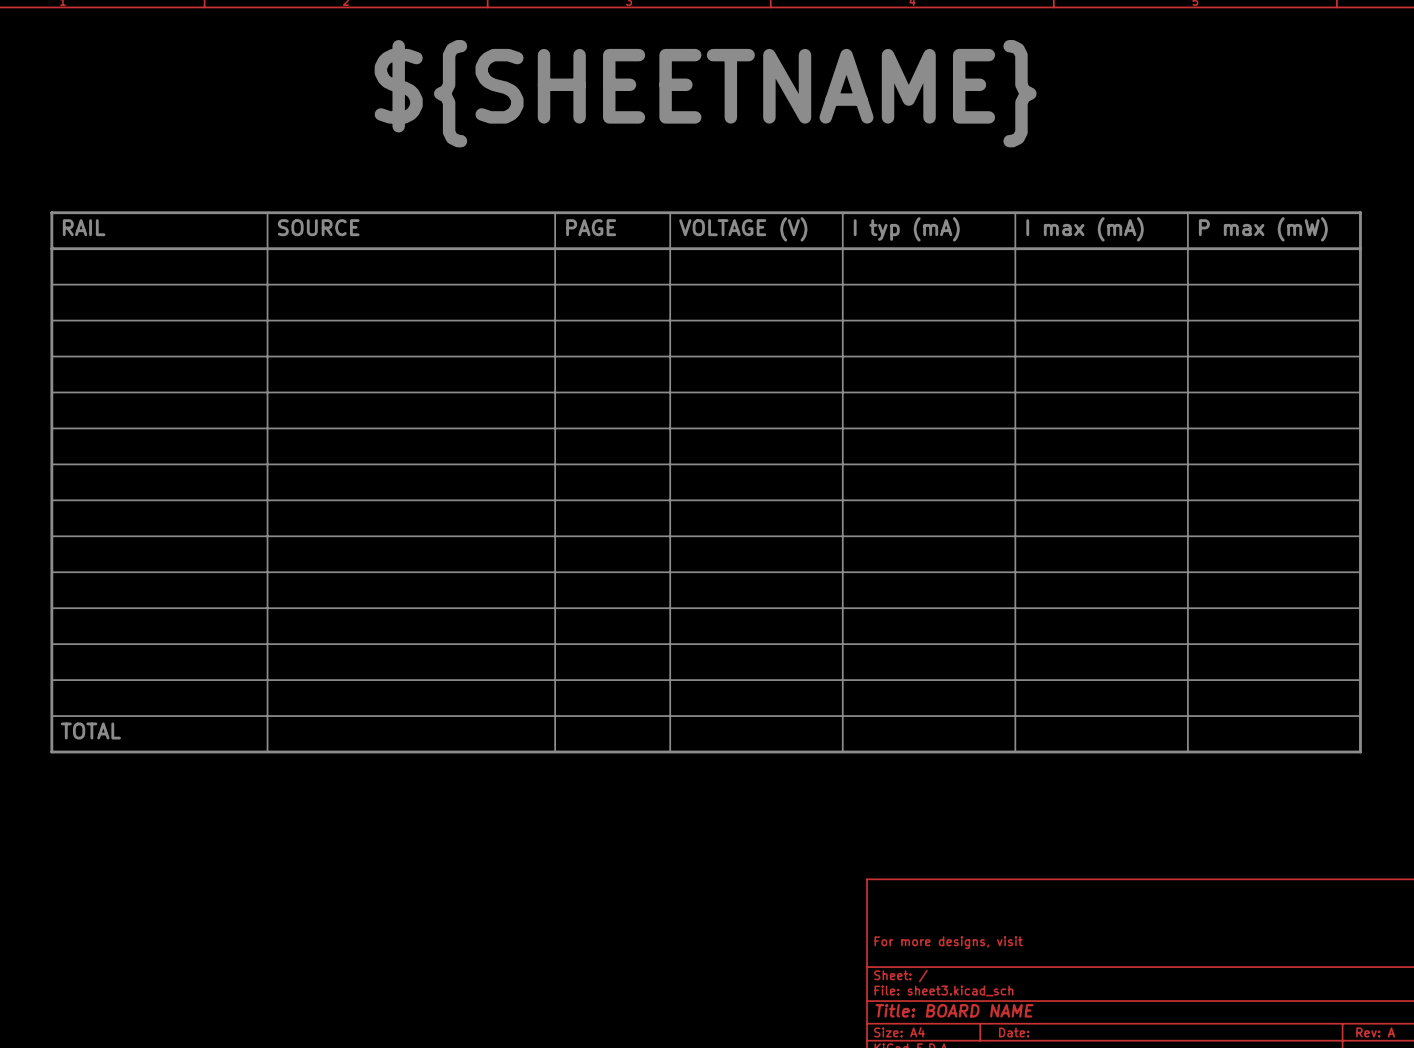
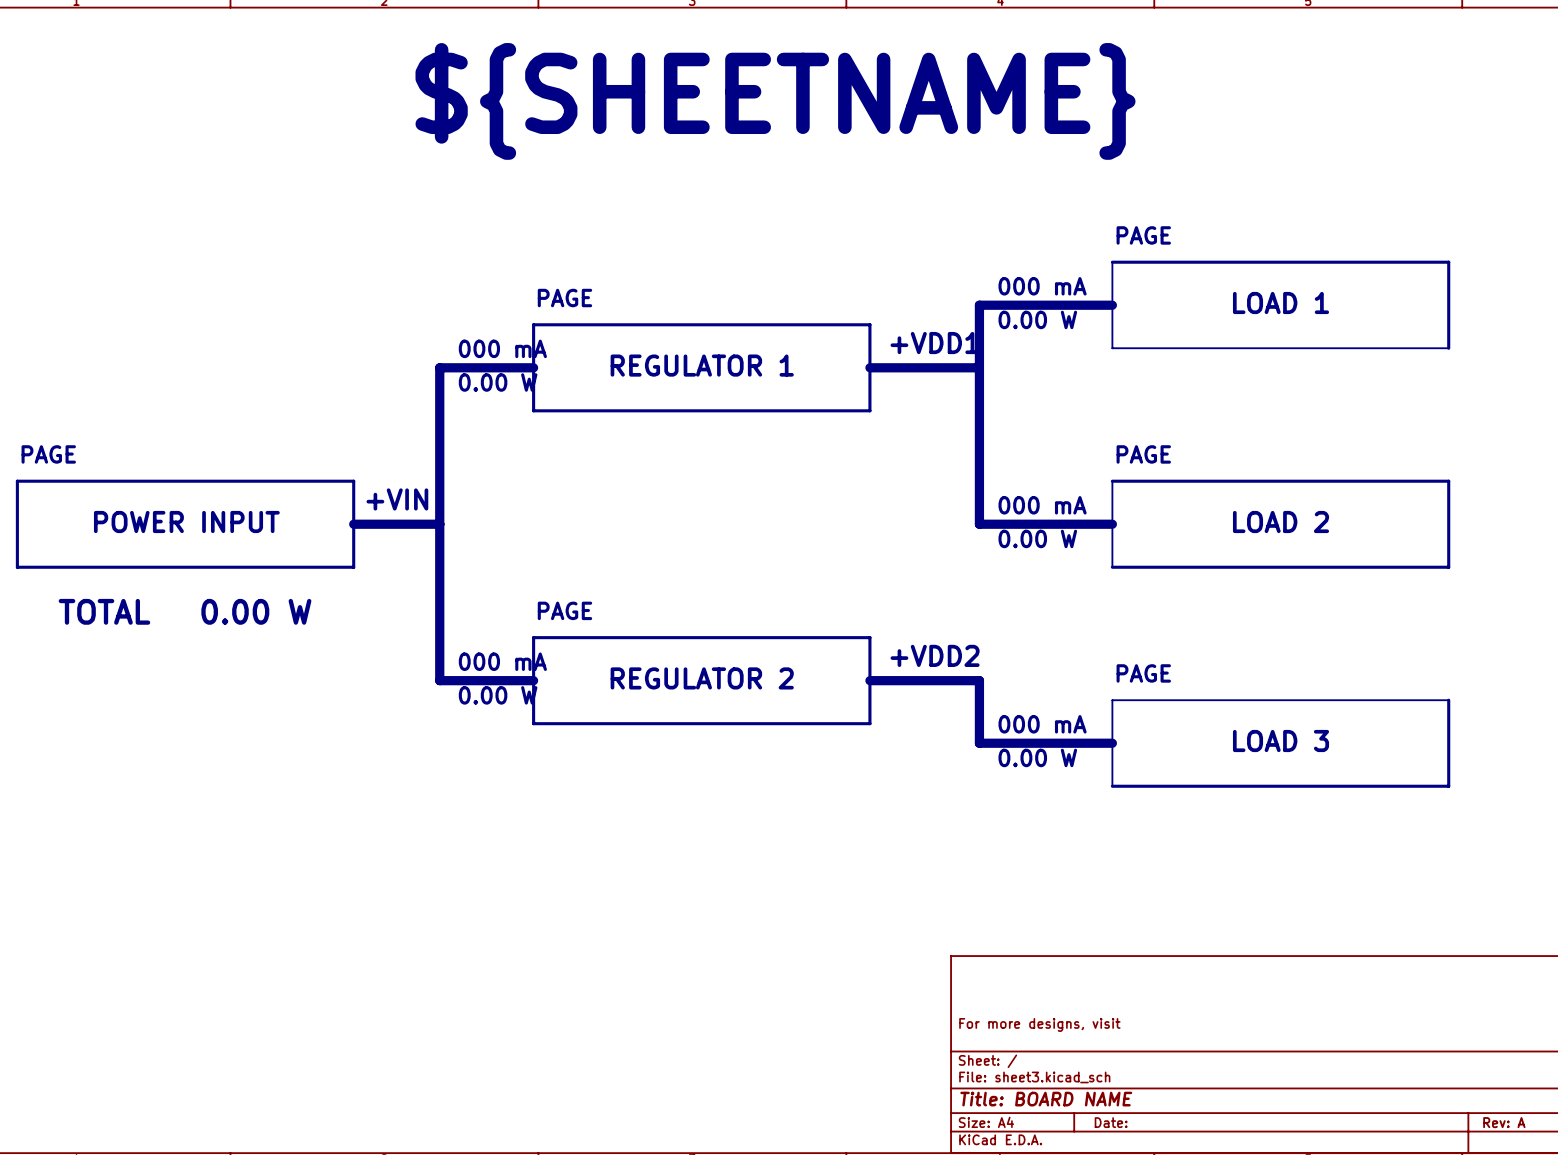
line: (51, 212) (1360, 212) (1360, 752) (51, 752) (51, 212) -> none
line: (267, 212) (267, 752) -> none
line: (555, 212) (555, 752) -> none
line: (670, 212) (670, 752) -> none
line: (842, 212) (842, 752) -> none
line: (1015, 212) (1015, 241) -> (1448, 348) (1448, 262) (1112, 262)
line: (1187, 212) (1187, 752) -> none
text: none -> PAGE (1143, 235)
text: RAIL (84, 227) -> none
text: SOURCE (318, 227) -> none
text position: PAGE (591, 227) -> PAGE (564, 298)
text: VOLTAGE (V) (743, 229) -> none
text: I typ (mA) (906, 229) -> none
text: I max (mA) (1085, 229) -> none
text: P max (mW) (1263, 229) -> none
line: (51, 248) (1360, 248) -> none
text: none -> 000 mA (1042, 286)
text: none -> LOAD 1 (1281, 302)
line: none -> (1112, 305) (979, 305) (979, 524) (1112, 524)
line: (51, 284) (1360, 284) -> none
text: none -> 0.00 W (1037, 319)
line: none -> (533, 324) (869, 324) (869, 410) (533, 410) (533, 324)
text: none -> +VDD1 (935, 343)
line: (51, 320) (1015, 320) (1015, 442) -> (1112, 567) (1448, 567) (1448, 481) (1112, 481)
line: (1324, 320) (1360, 320) -> none
text: none -> 000 mA (502, 348)
text: none -> REGULATOR 1 (702, 365)
line: none -> (533, 367) (439, 367) (439, 680) (533, 680)
line: none -> (869, 367) (979, 367)
text: none -> 0.00 W (498, 382)
line: (51, 356) (1360, 356) -> none
line: (51, 392) (1360, 392) -> none
text: none -> PAGE (48, 454)
text: none -> PAGE (1143, 454)
line: (51, 428) (1360, 428) -> none
line: none -> (17, 481) (353, 481) (353, 567) (17, 567) (17, 481)
text: none -> +VIN (397, 499)
line: (51, 464) (1360, 464) -> none
text: none -> 000 mA (1042, 505)
text: none -> POWER INPUT (186, 522)
text: none -> LOAD 2 (1281, 522)
line: none -> (353, 524) (439, 524)
text: none -> 0.00 W (1037, 538)
line: (51, 500) (1360, 500) -> none
line: (1015, 521) (1015, 644) (51, 644) -> none
line: (51, 536) (1360, 536) -> none
text: none -> TOTAL 0.00 W (185, 611)
text: none -> PAGE (564, 610)
line: (51, 572) (1360, 572) -> none
line: none -> (533, 637) (533, 723) (869, 723) (869, 637) (533, 637)
text: none -> +VDD2 (935, 655)
line: (51, 608) (1360, 608) -> none
text: none -> 000 mA (502, 661)
text: none -> PAGE (1143, 673)
text: none -> REGULATOR 2 (702, 678)
line: none -> (869, 680) (979, 680) (979, 743) (1112, 743)
text: none -> 0.00 W (498, 695)
line: (1324, 644) (1360, 644) -> none
text: none -> 000 mA (1042, 724)
line: (51, 680) (1360, 680) -> none
text: none -> LOAD 3 (1281, 741)
text: none -> 0.00 W (1037, 757)
line: (51, 716) (1360, 716) -> none
line: (1015, 723) (1015, 752) -> (1112, 786) (1448, 786) (1448, 700)
text: TOTAL (90, 730) -> none

